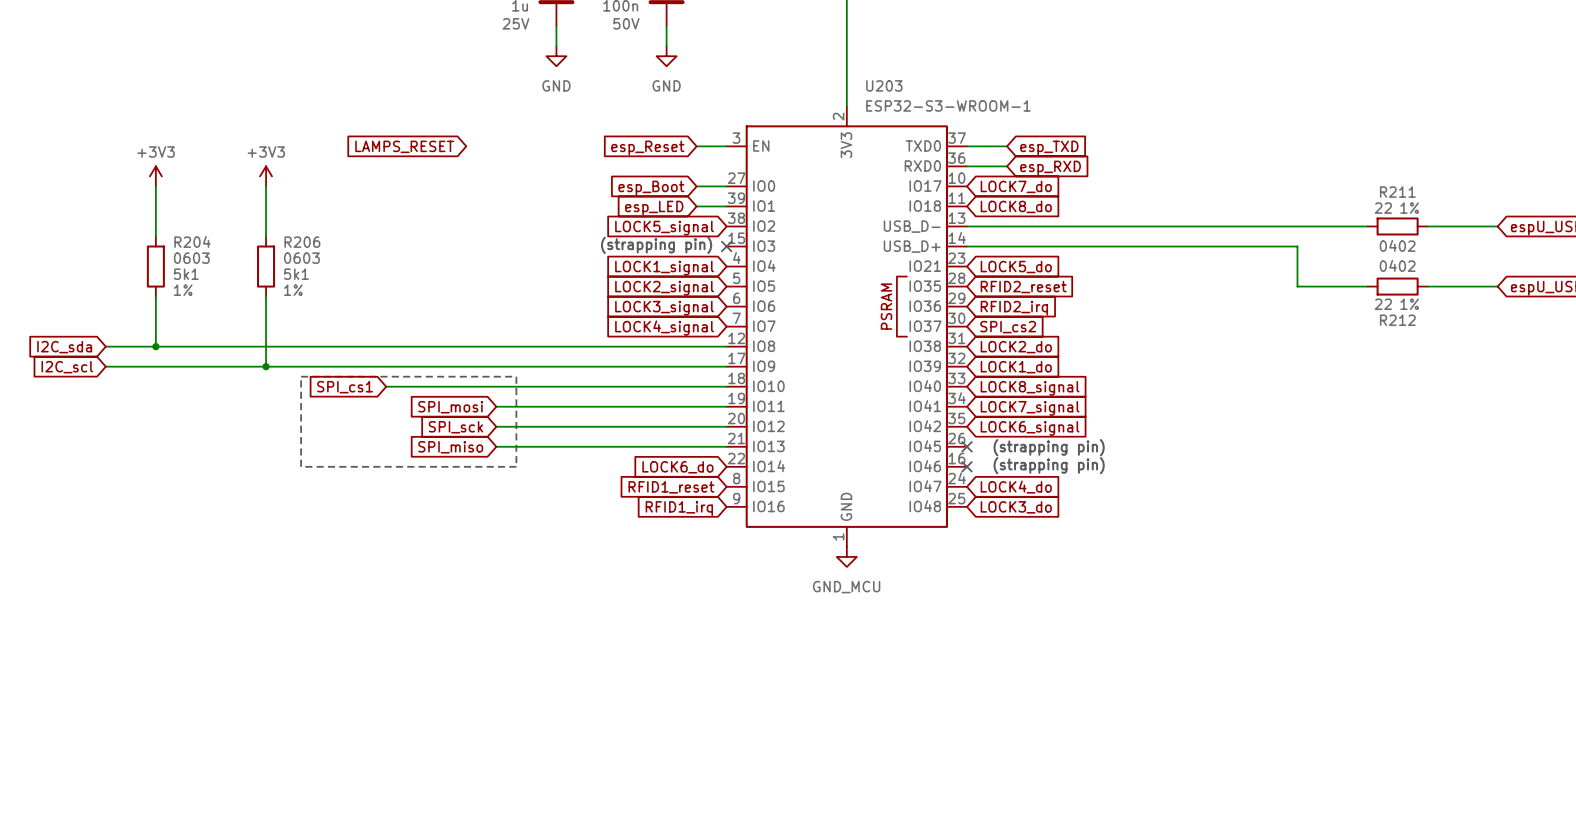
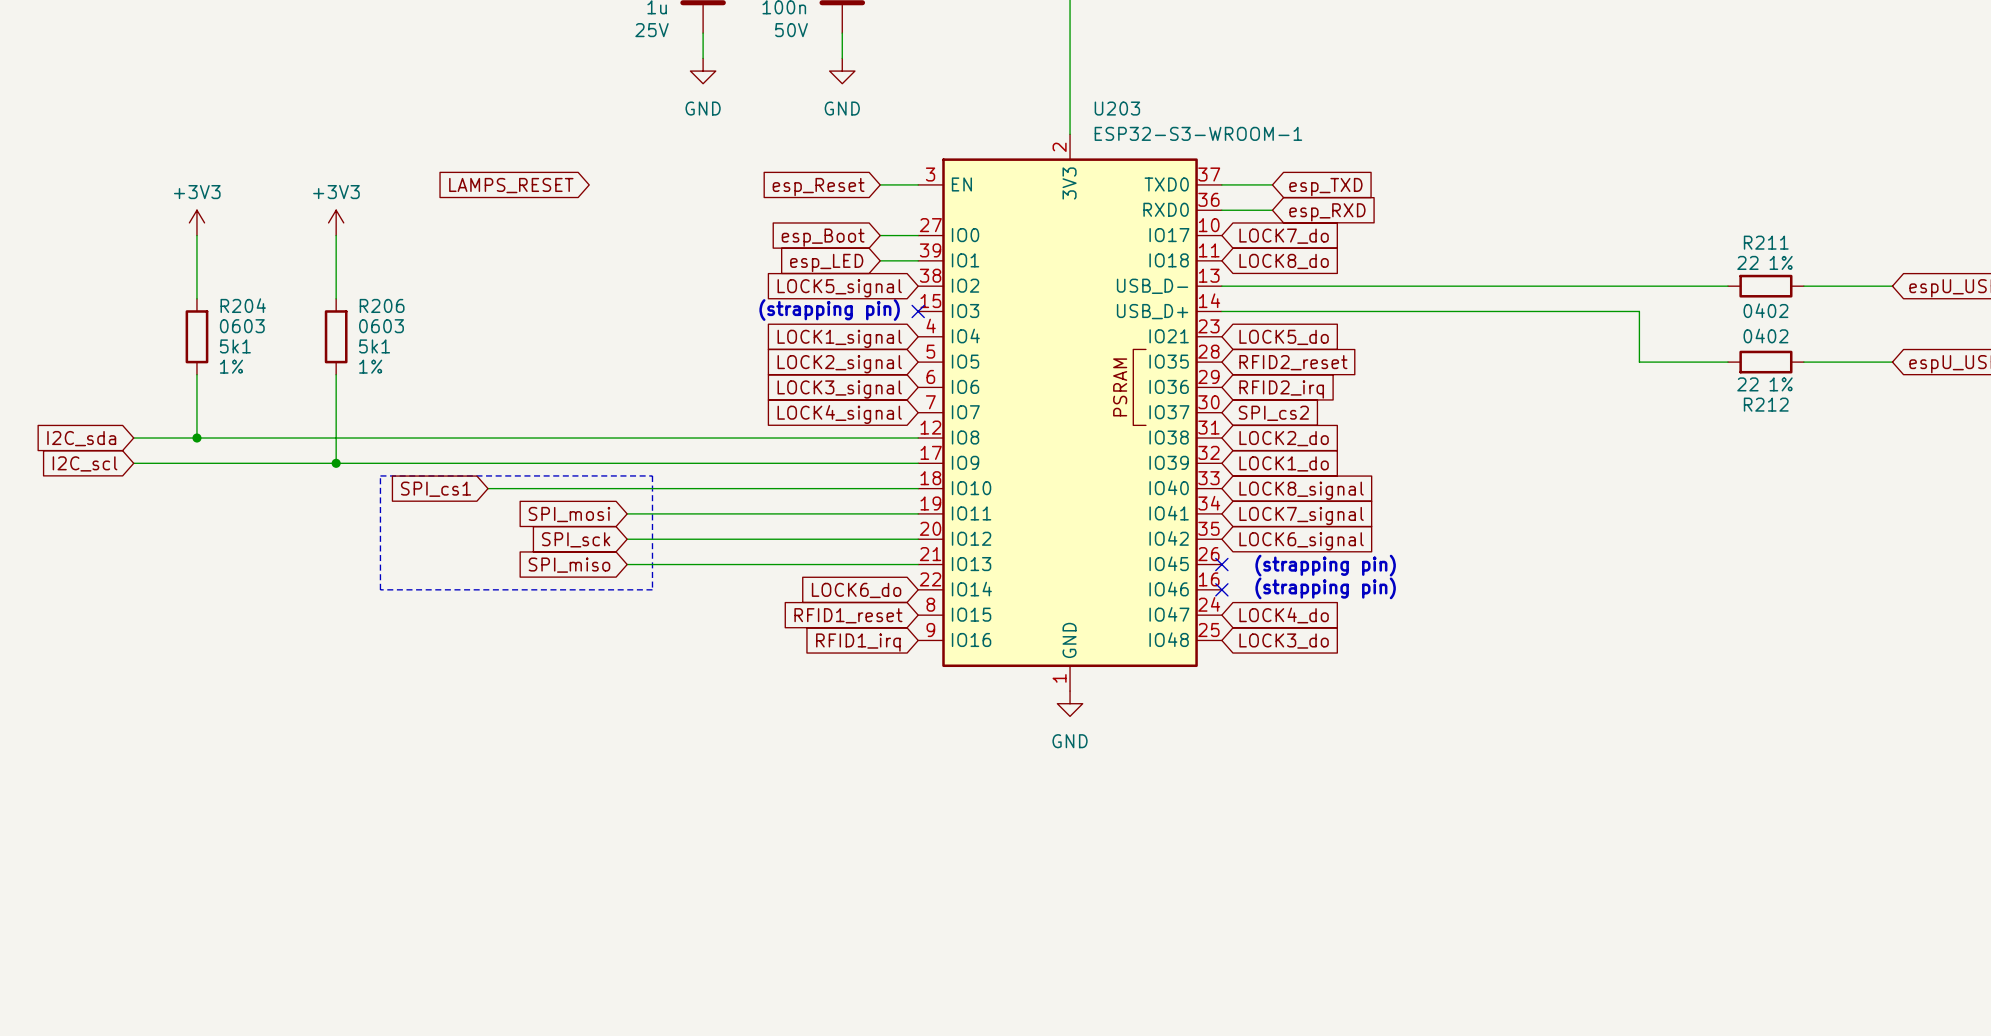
power symbol: GND_MCU (846, 556) -> GND (1070, 703)

